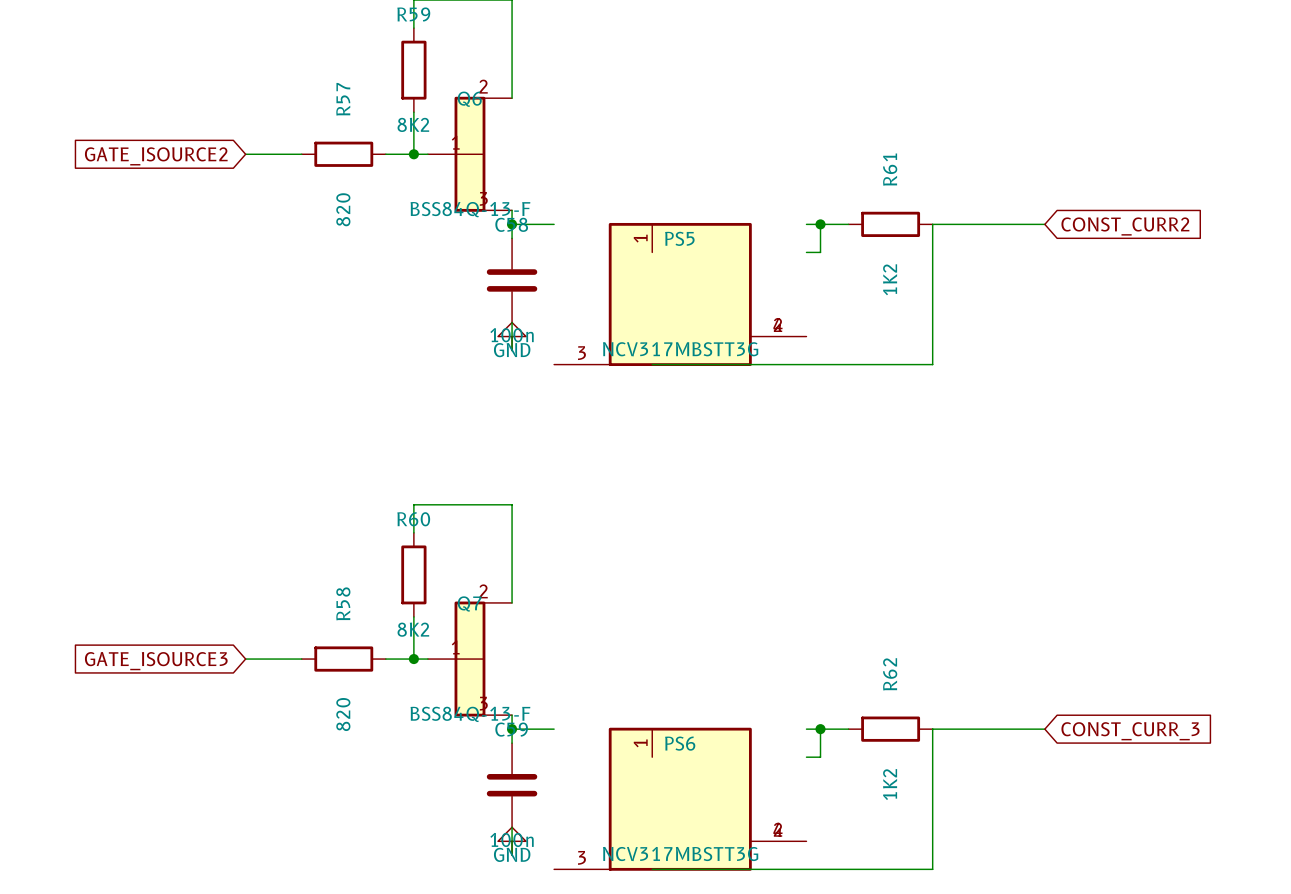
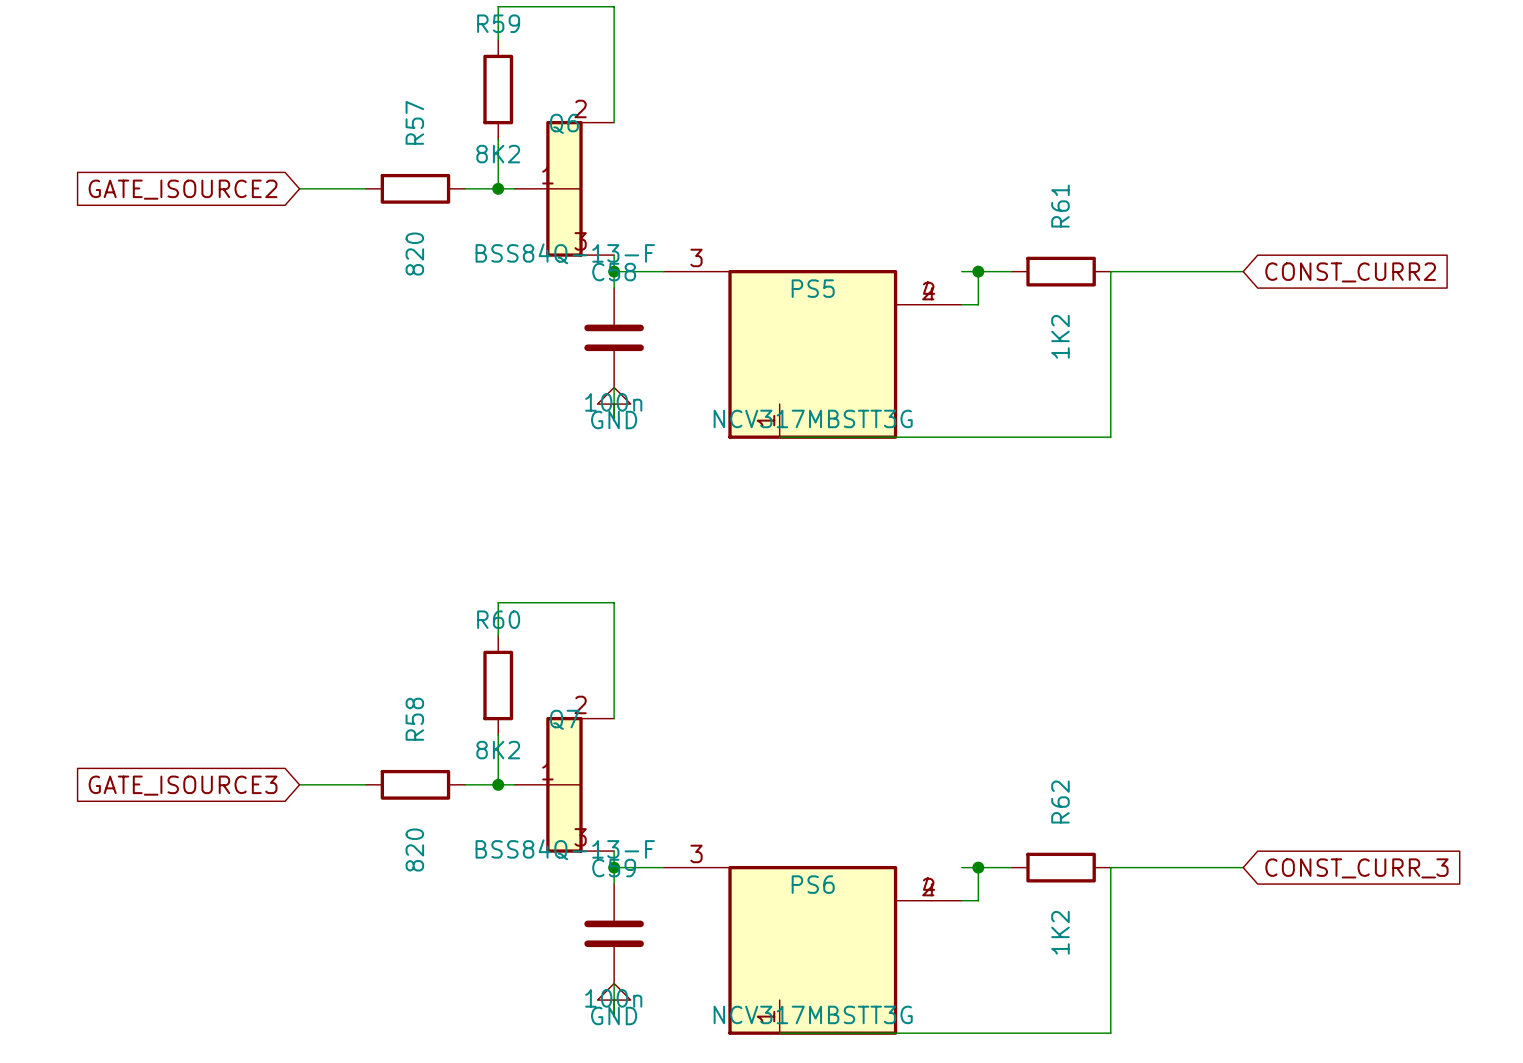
PS5 flip: as is (680, 294) -> up-down (812, 354)
PS6 flip: as is (680, 799) -> up-down (812, 950)

